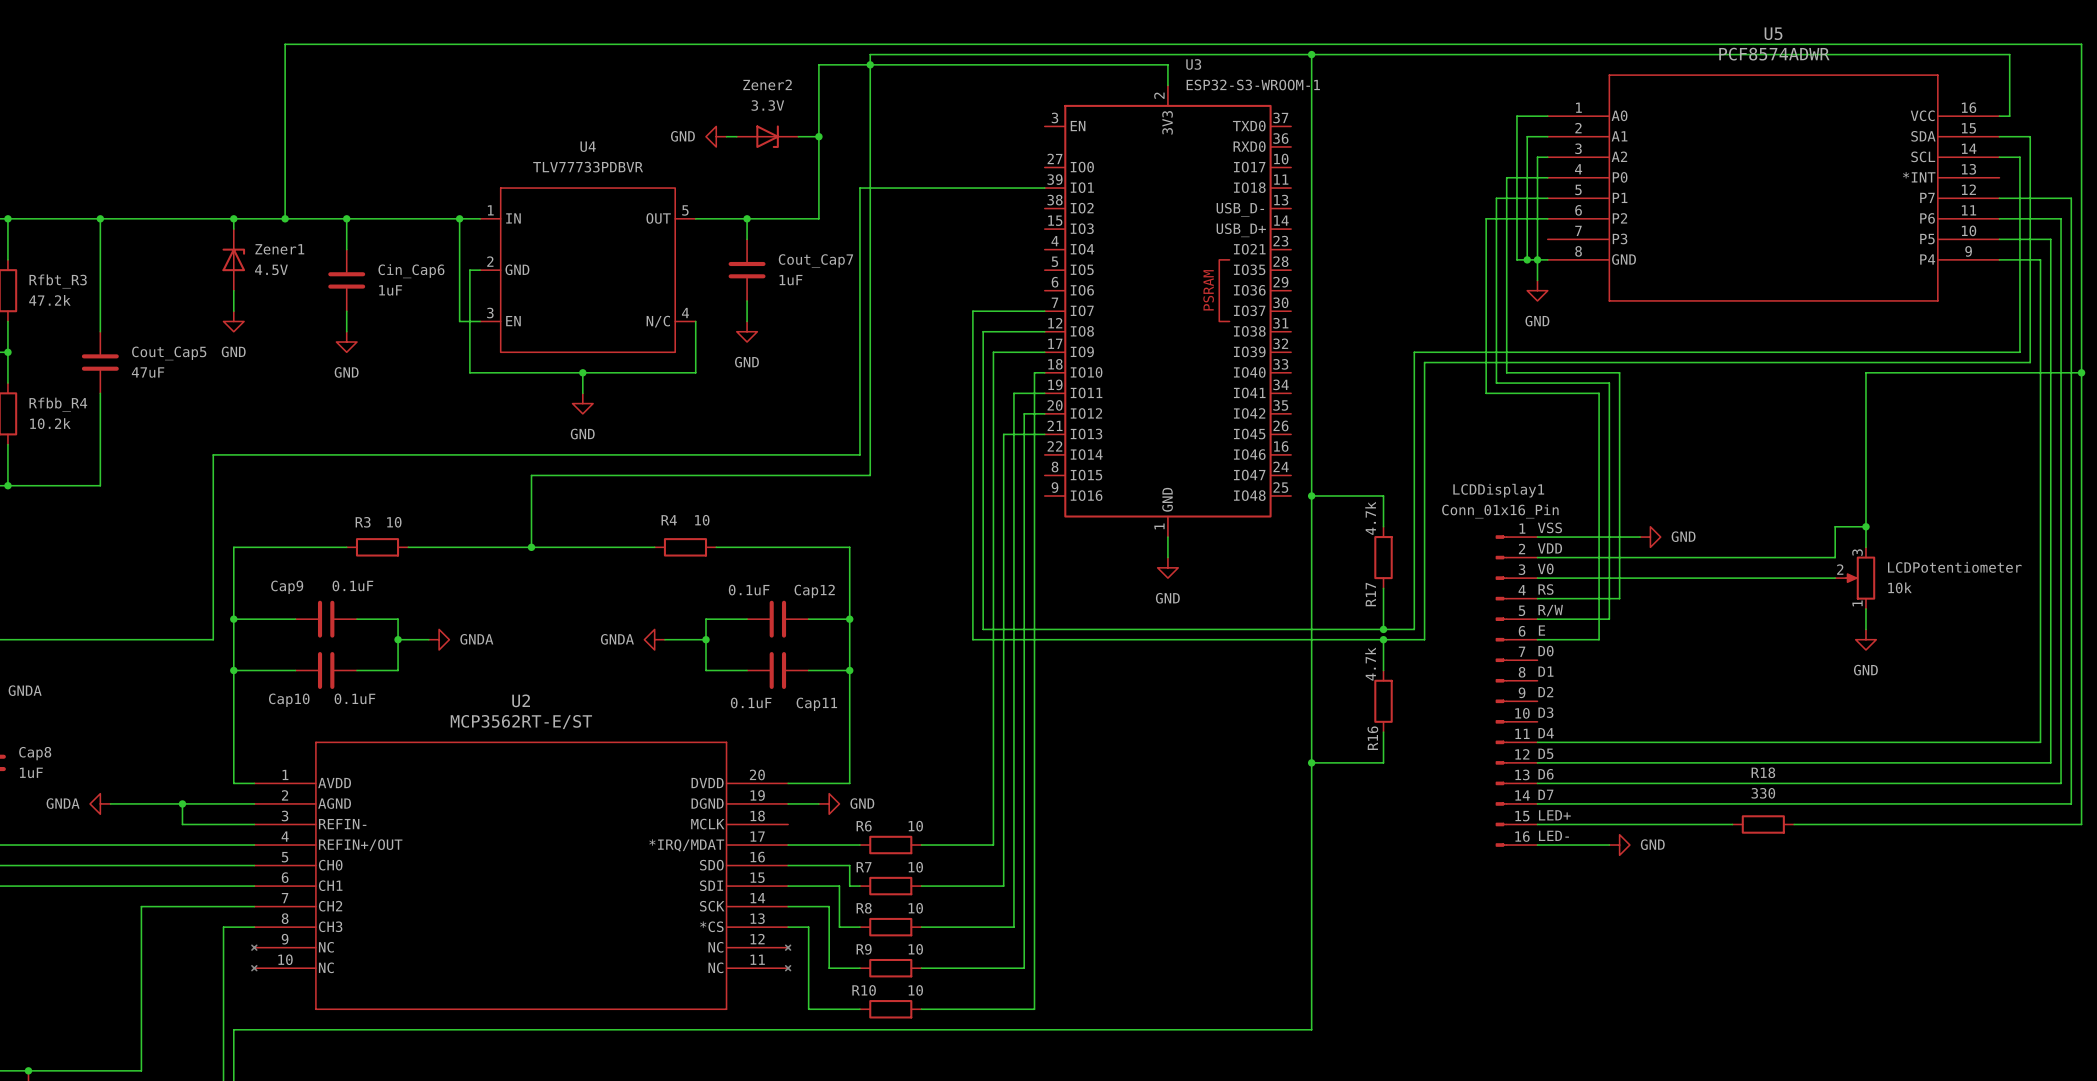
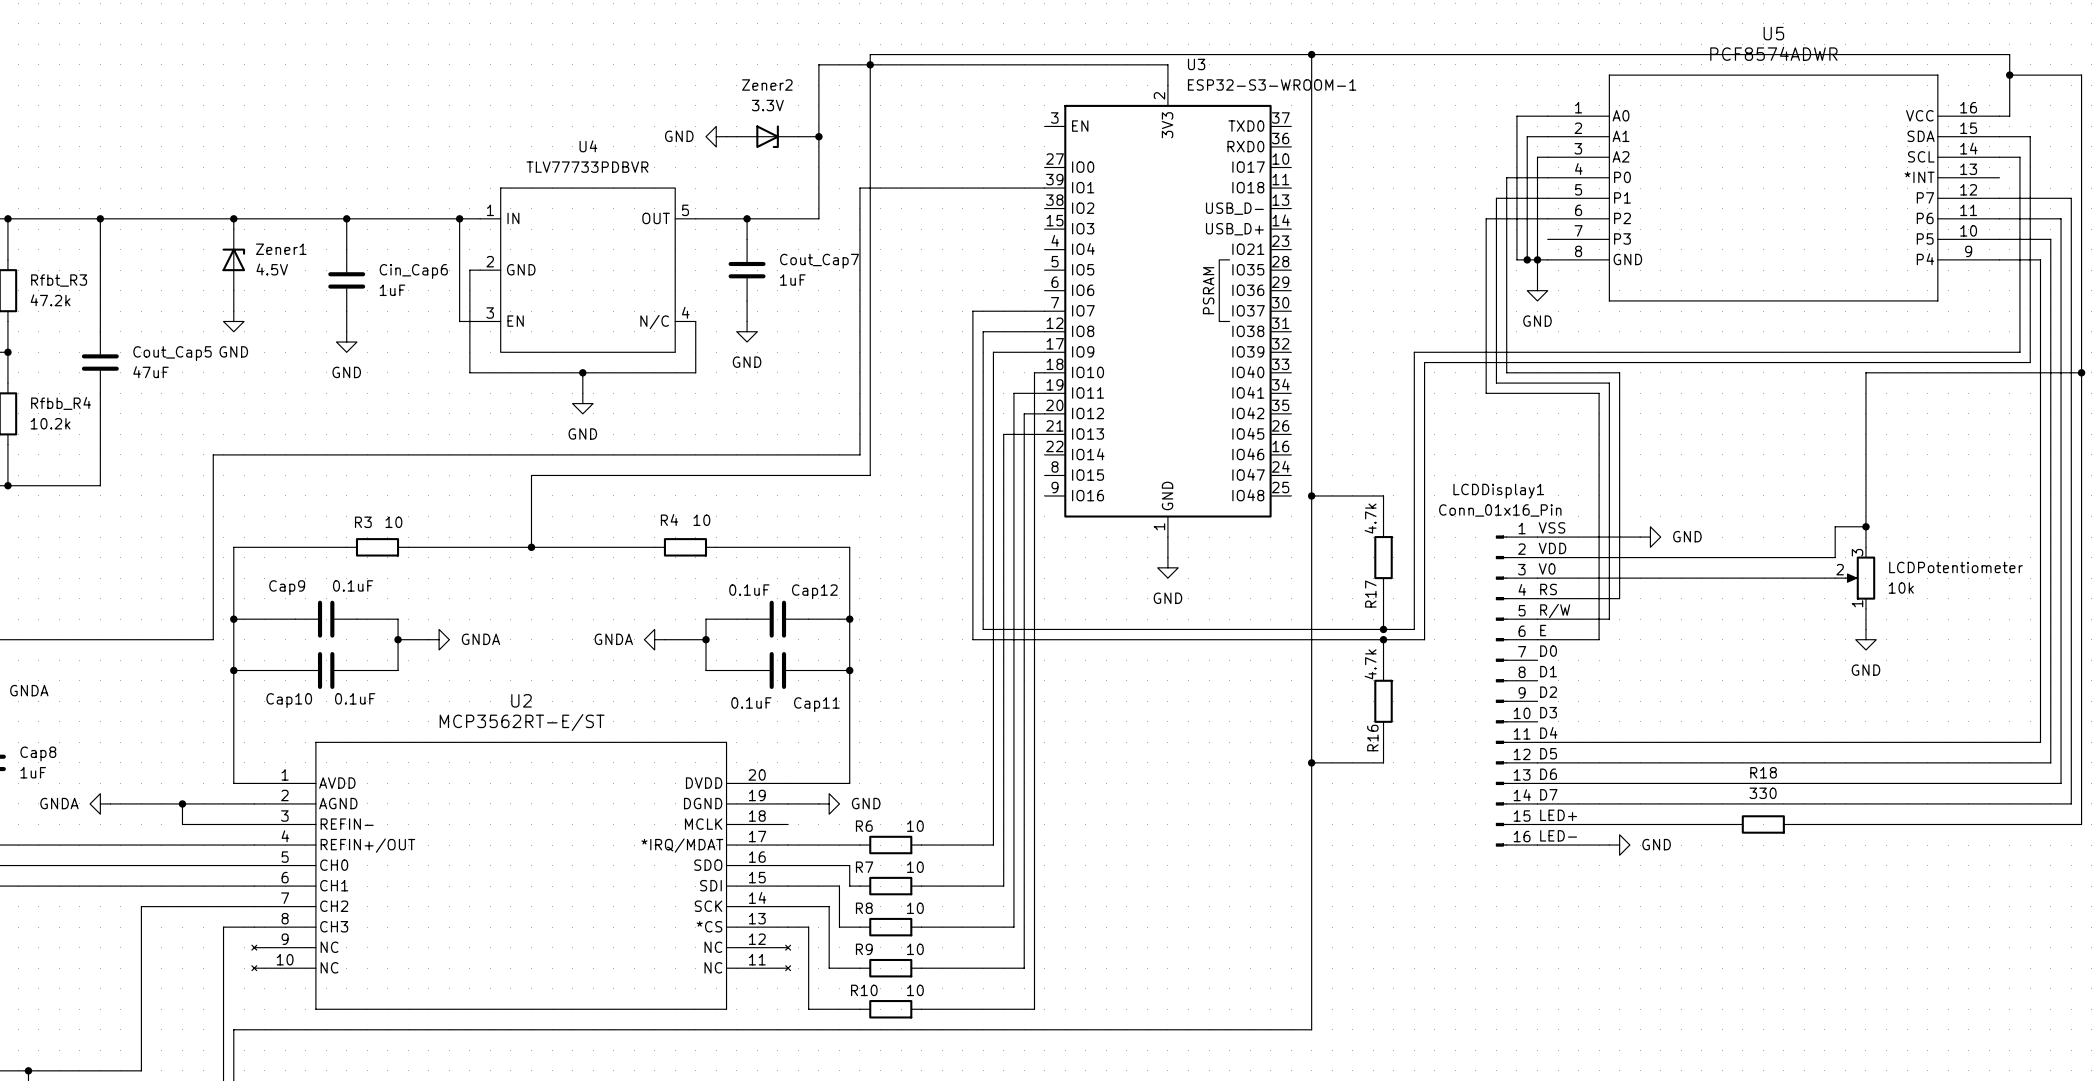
junction: none -> (2009, 75)
wire: (2081, 75) (2081, 44) (285, 44) (285, 218) -> (2081, 75) (2009, 75)
junction: (285, 218) -> none

